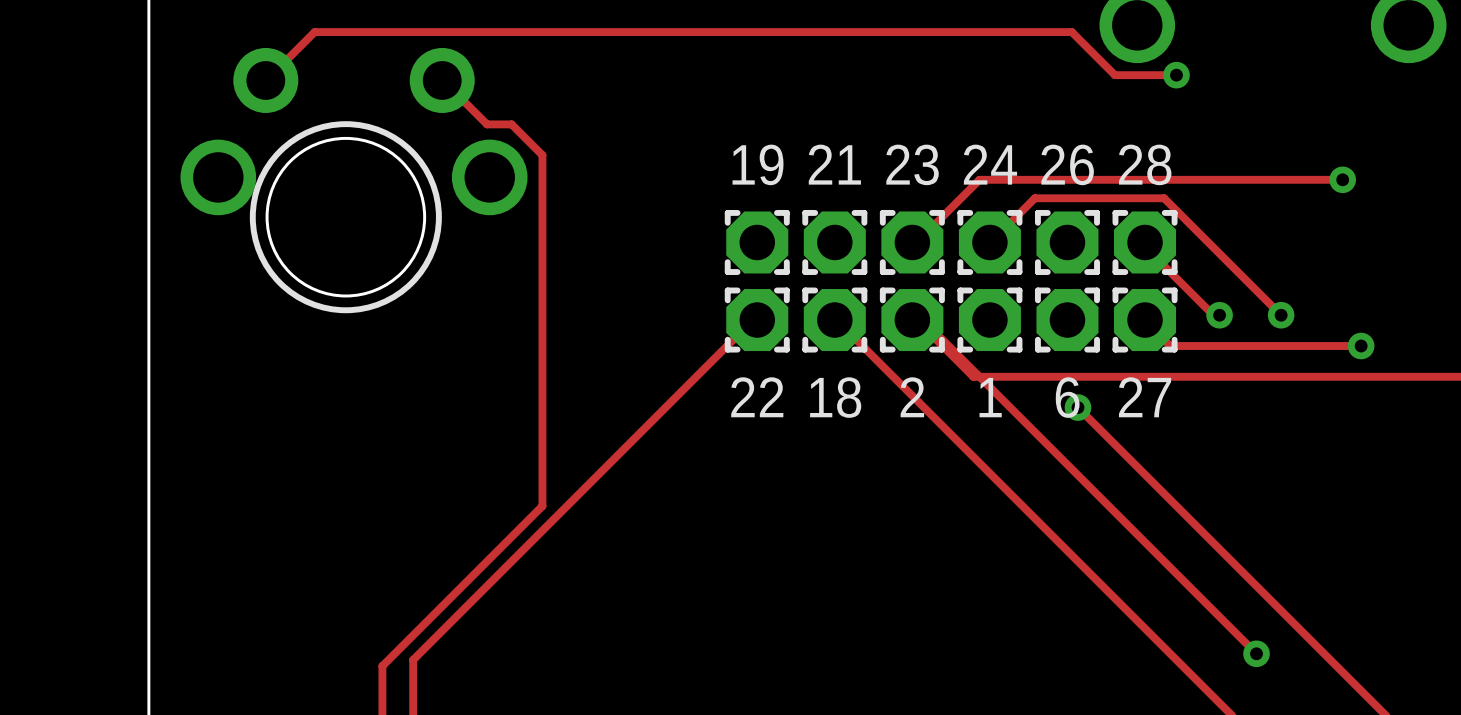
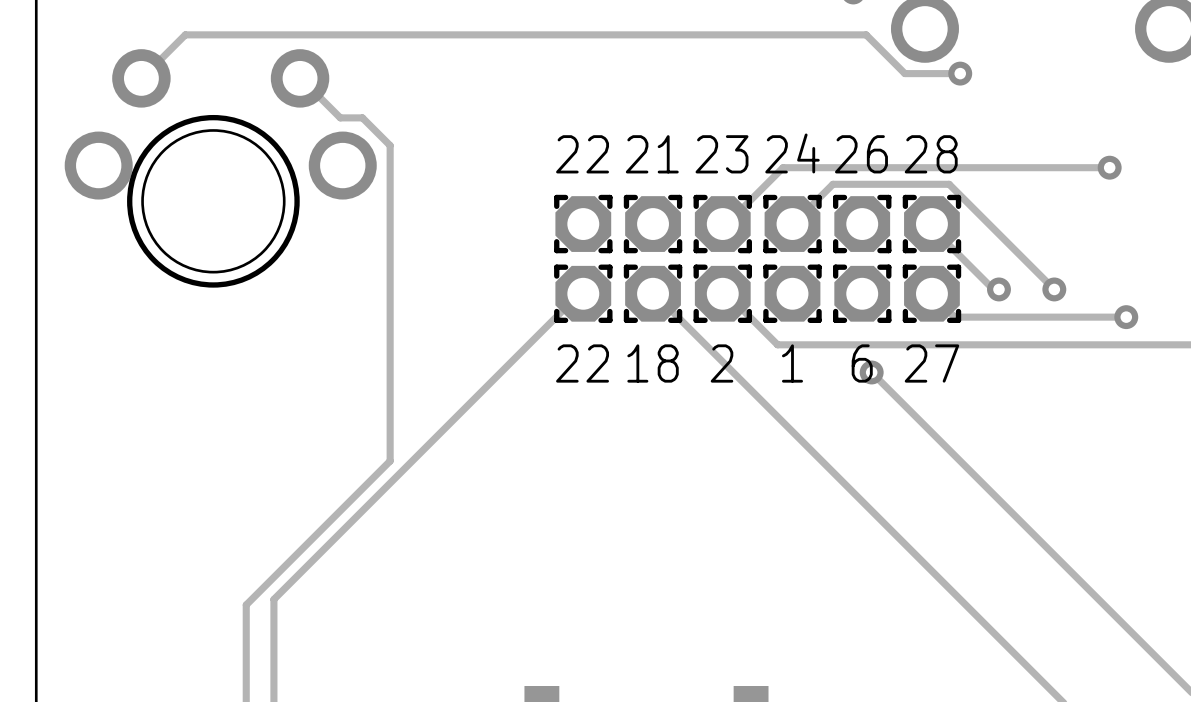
text: 19 (758, 164) -> 22 (582, 154)
track: (912, 320) (924, 321) (1256, 653) -> none
via: (1256, 653) -> none

